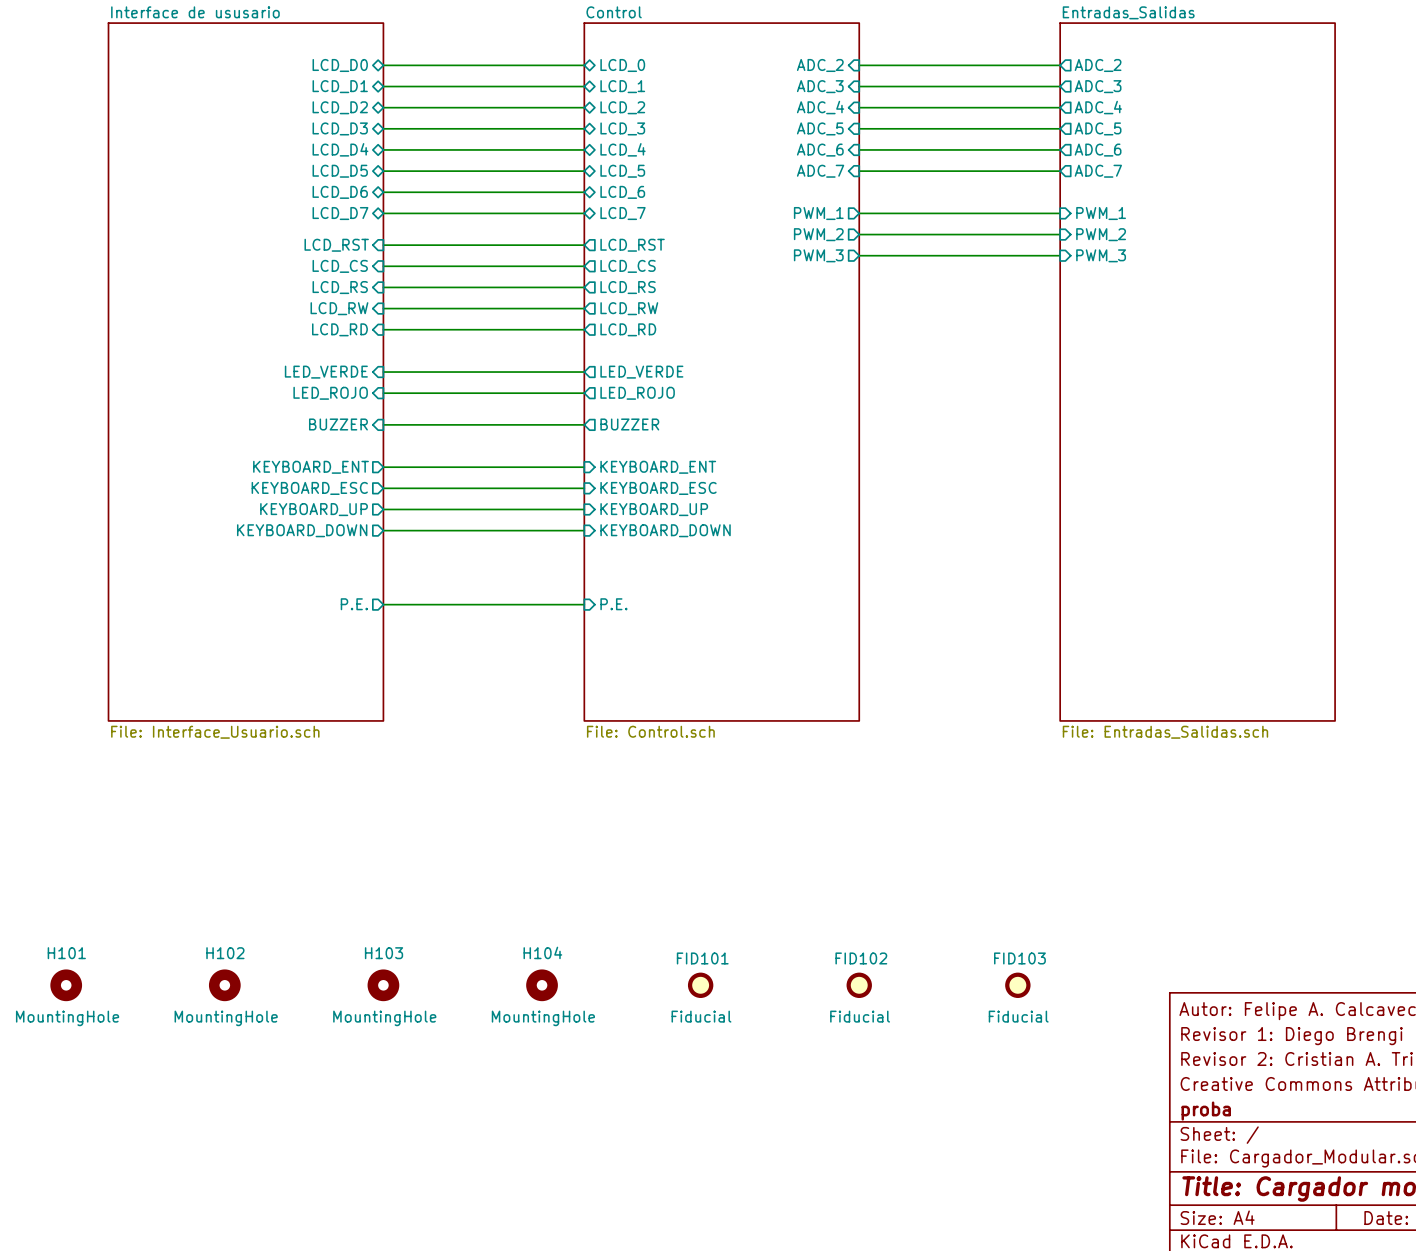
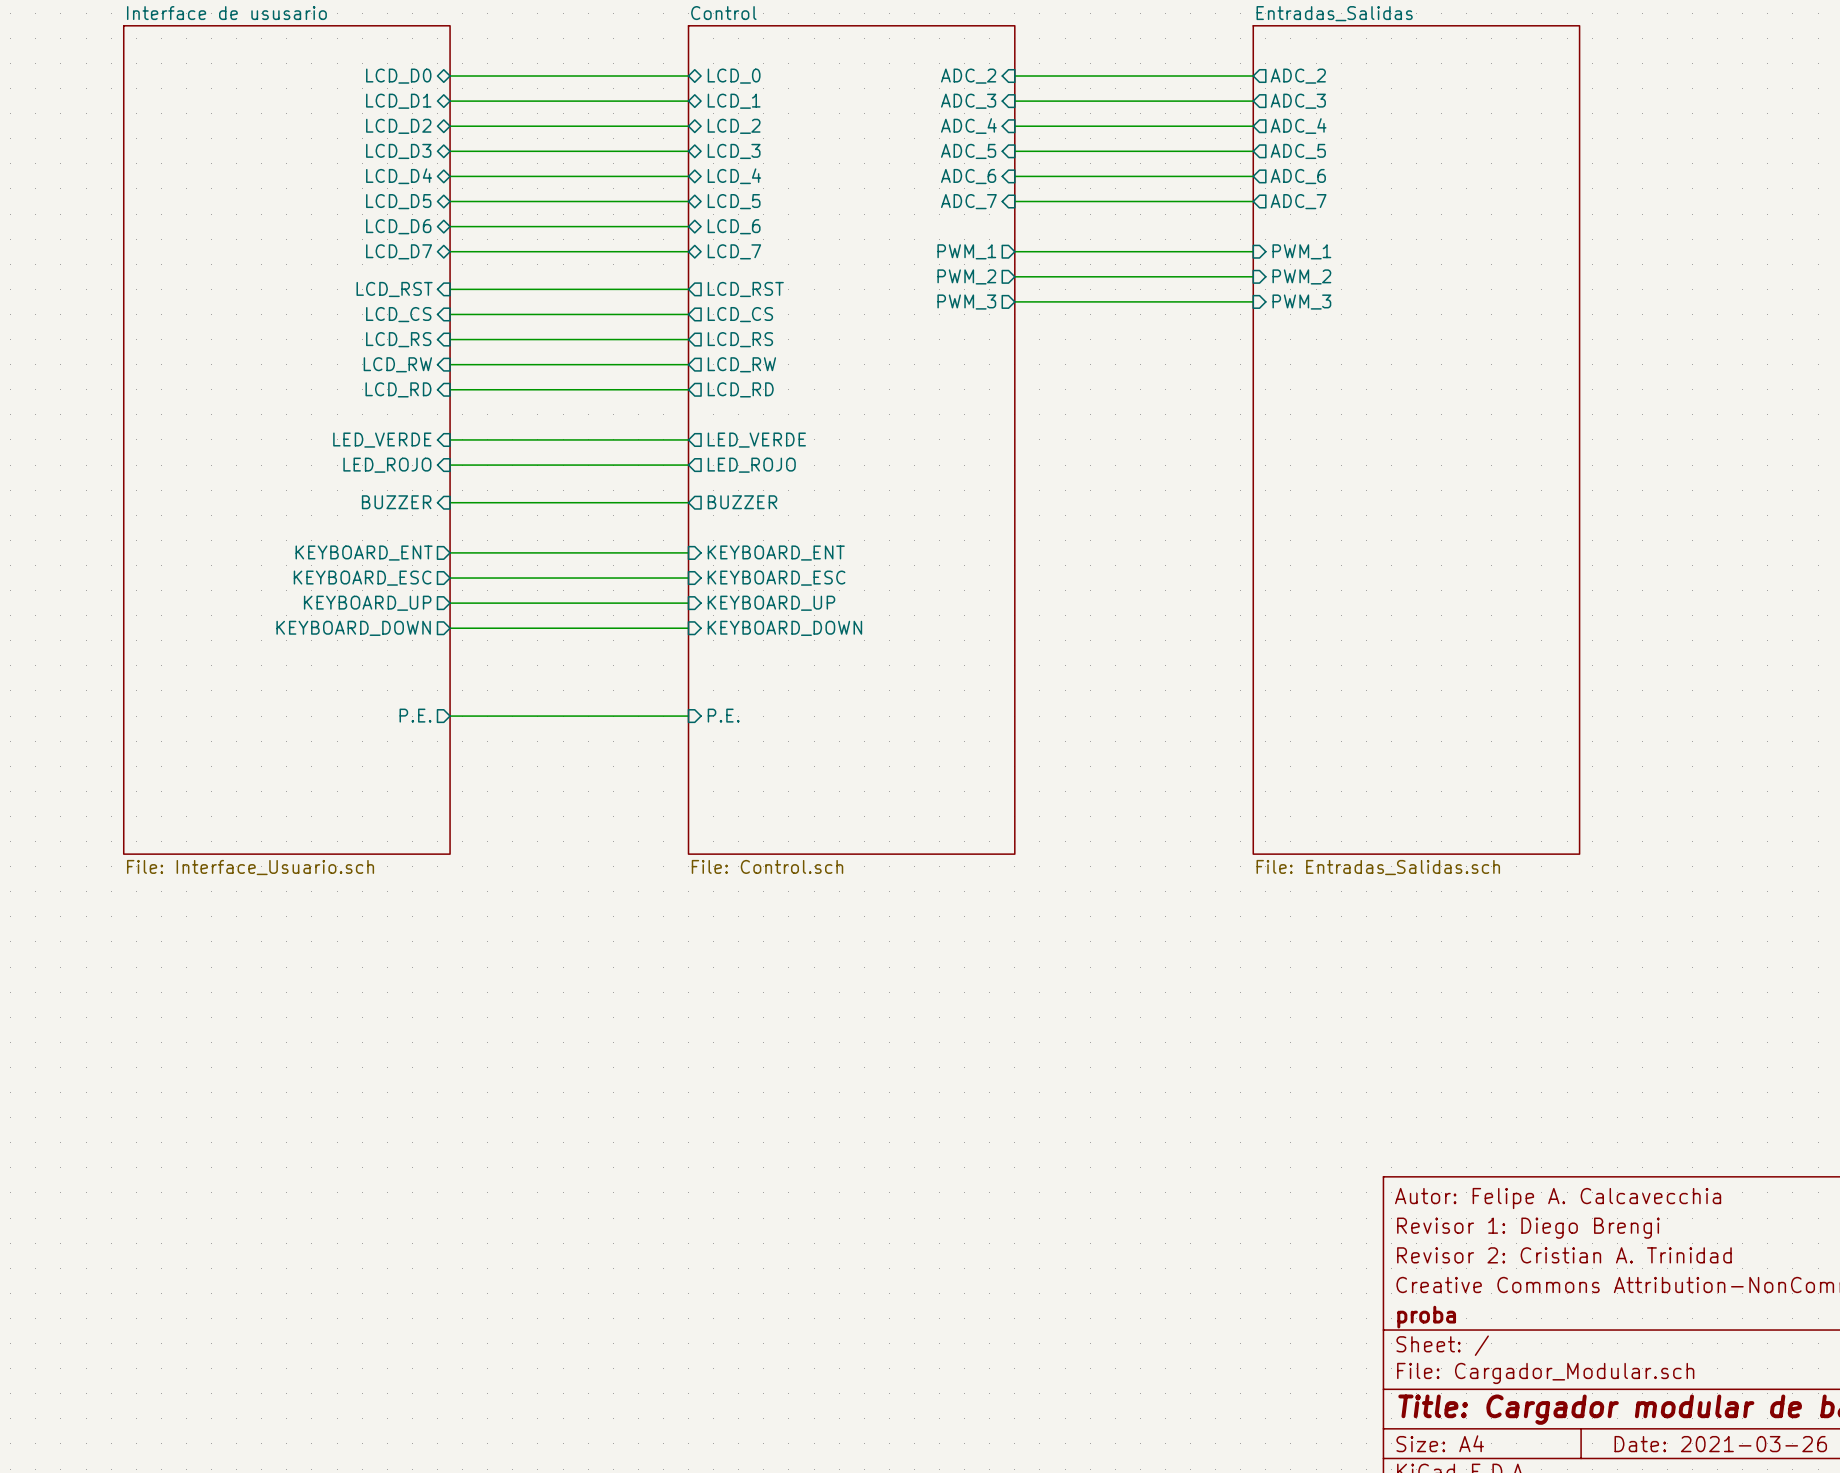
H101: MountingHole (66, 985) -> none
H102: MountingHole (224, 985) -> none
H103: MountingHole (383, 985) -> none
H104: MountingHole (542, 985) -> none
FID101: Fiducial (700, 985) -> none
FID102: Fiducial (859, 985) -> none
FID103: Fiducial (1017, 985) -> none

